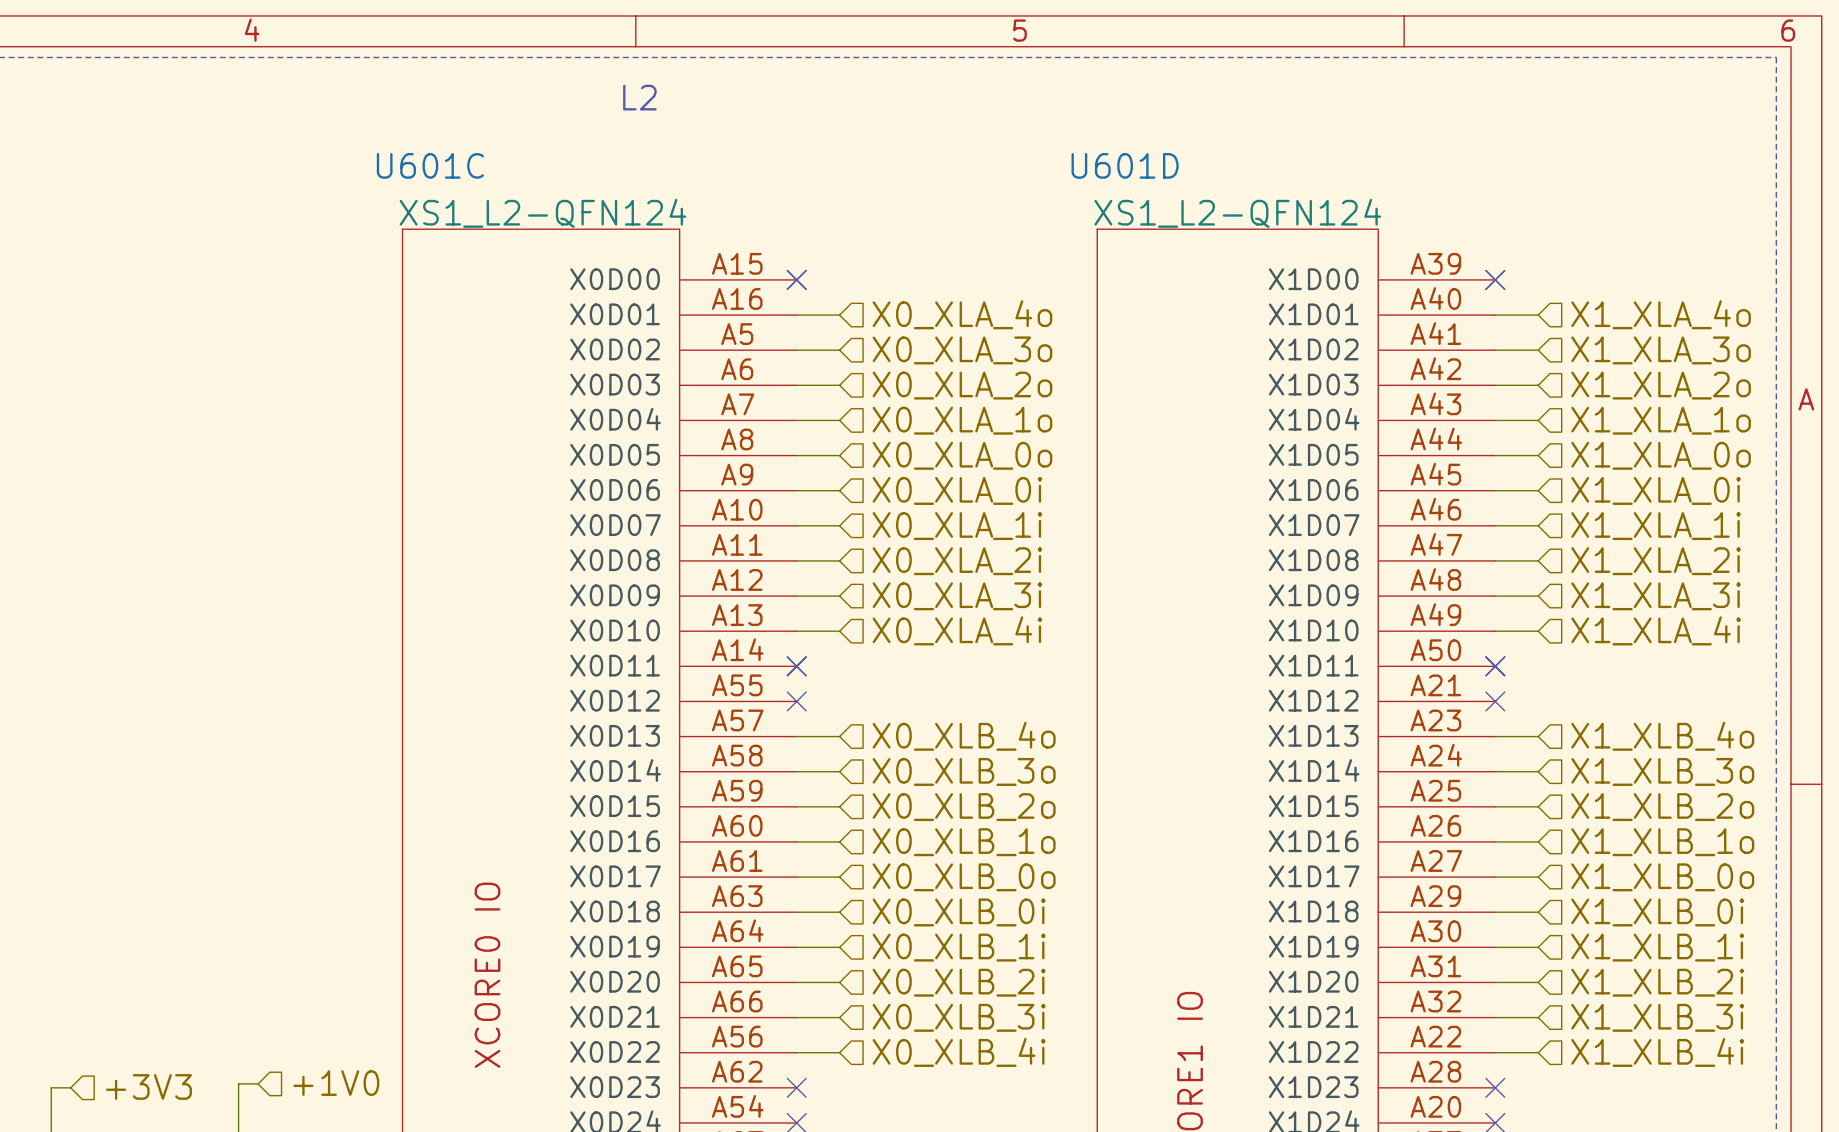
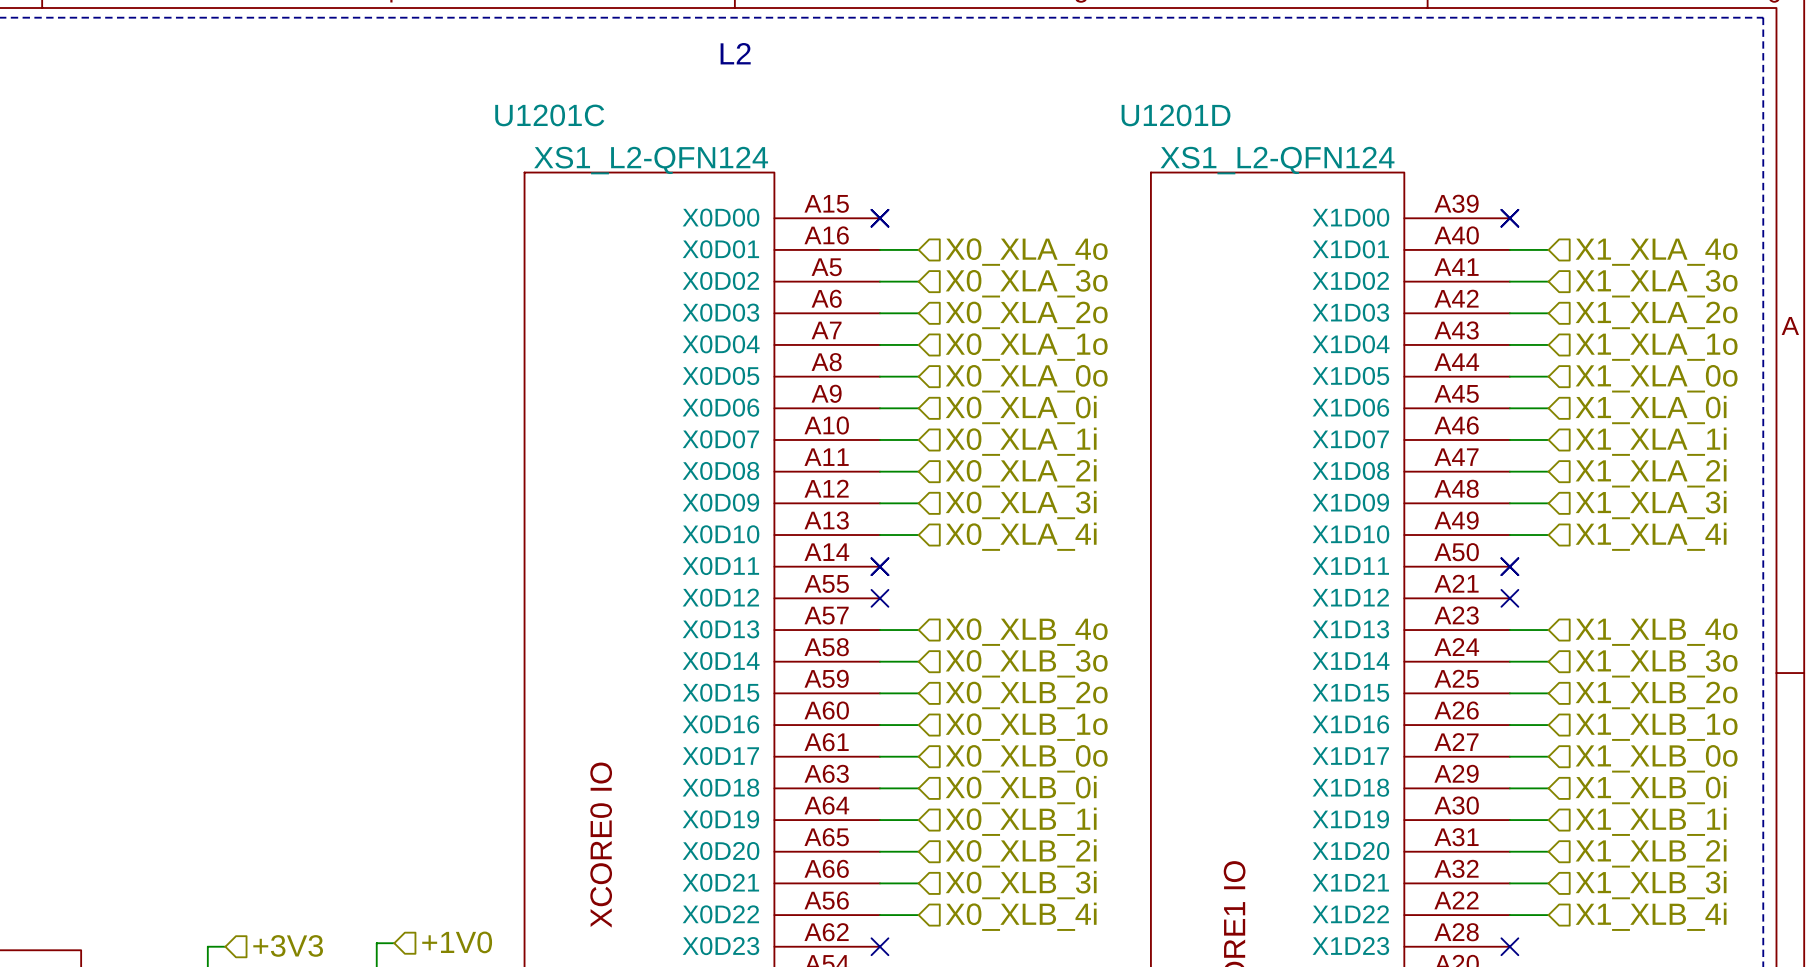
U601C name: U601C (430, 165) -> U1201C (549, 115)
U601D name: U601D (1125, 165) -> U1201D (1176, 115)

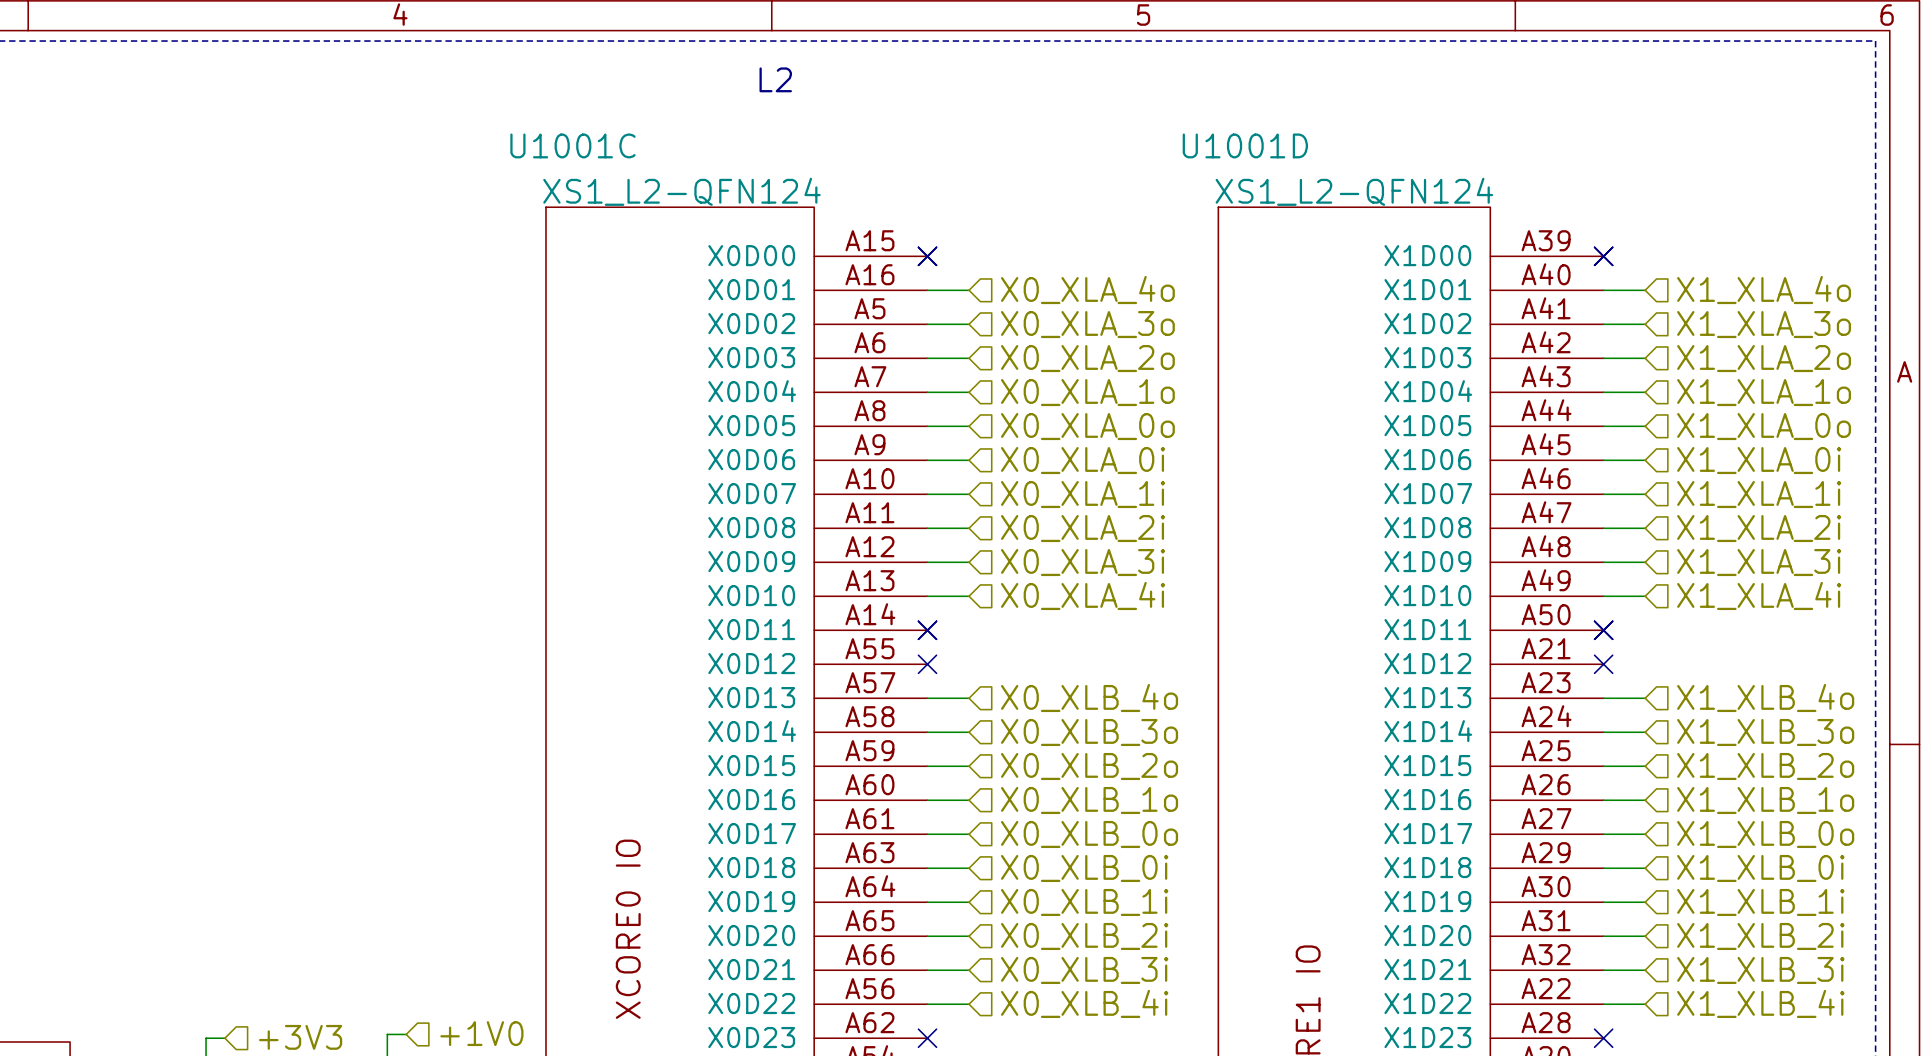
U1201C name: U1201C (549, 115) -> U1001C (572, 145)
U1201D name: U1201D (1176, 115) -> U1001D (1245, 145)

